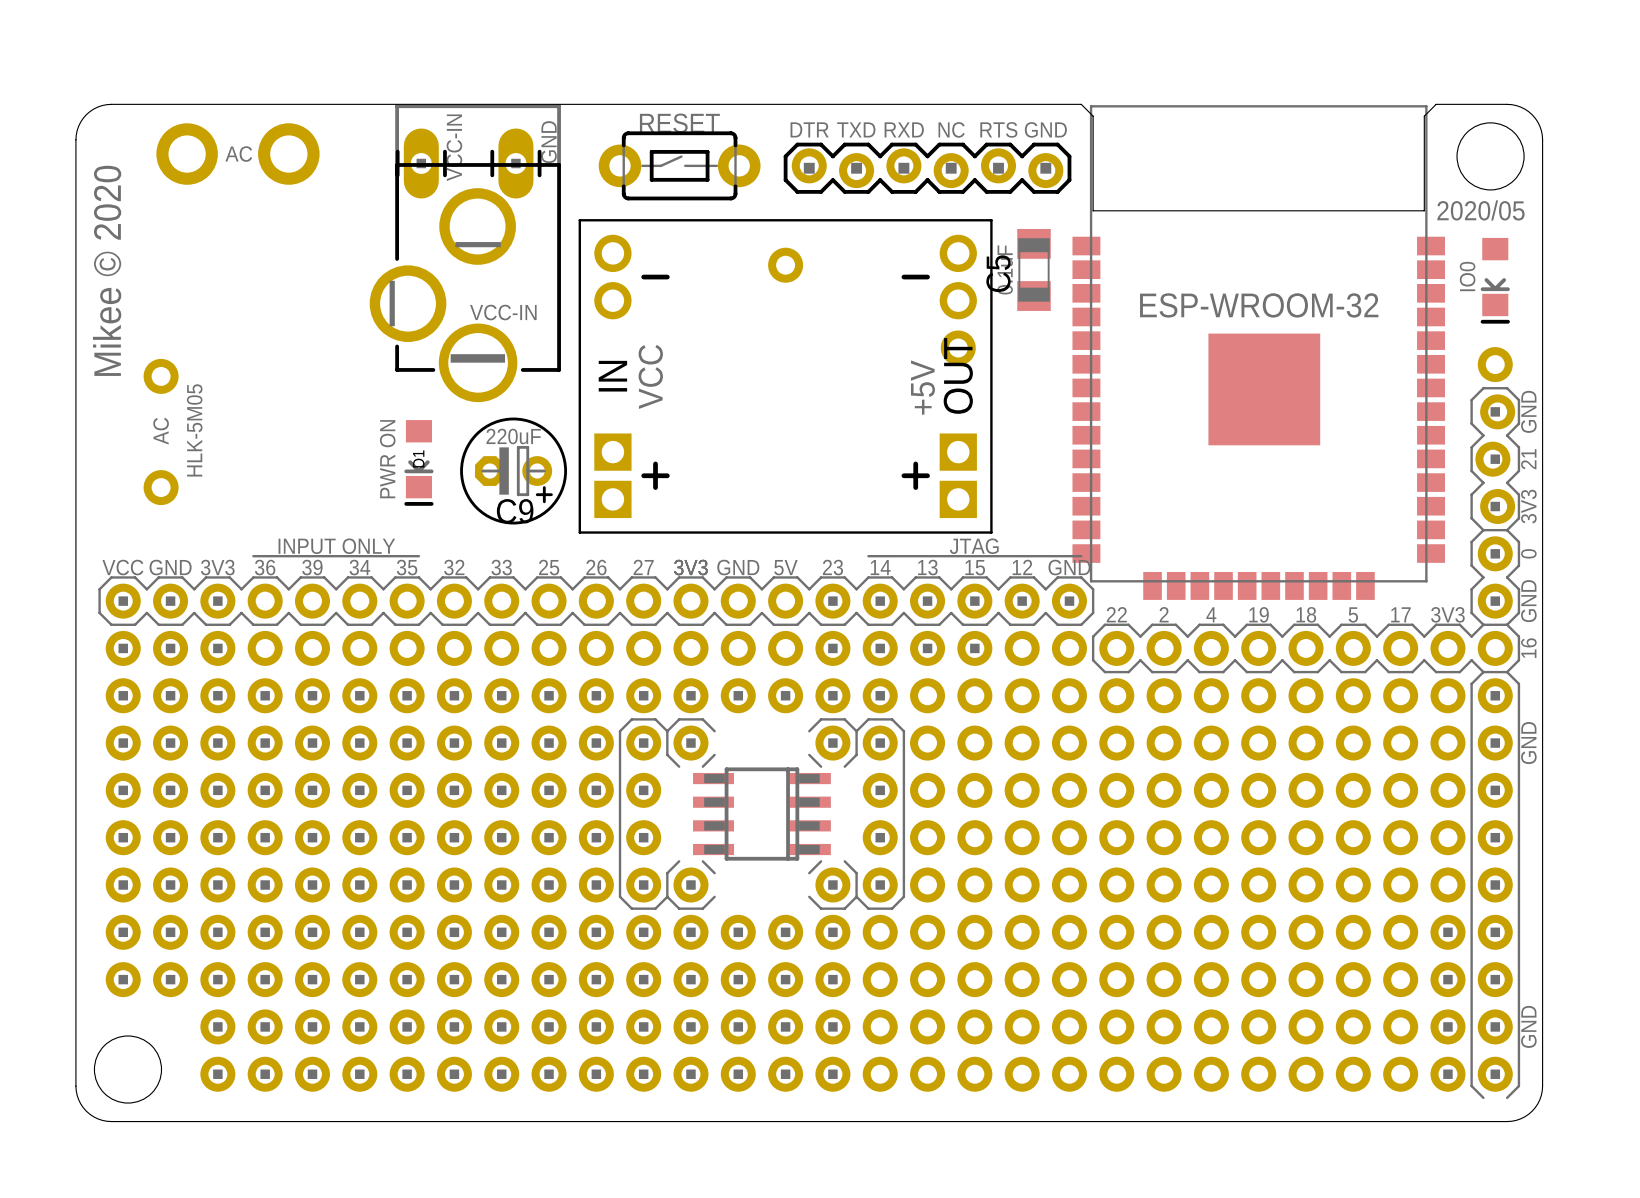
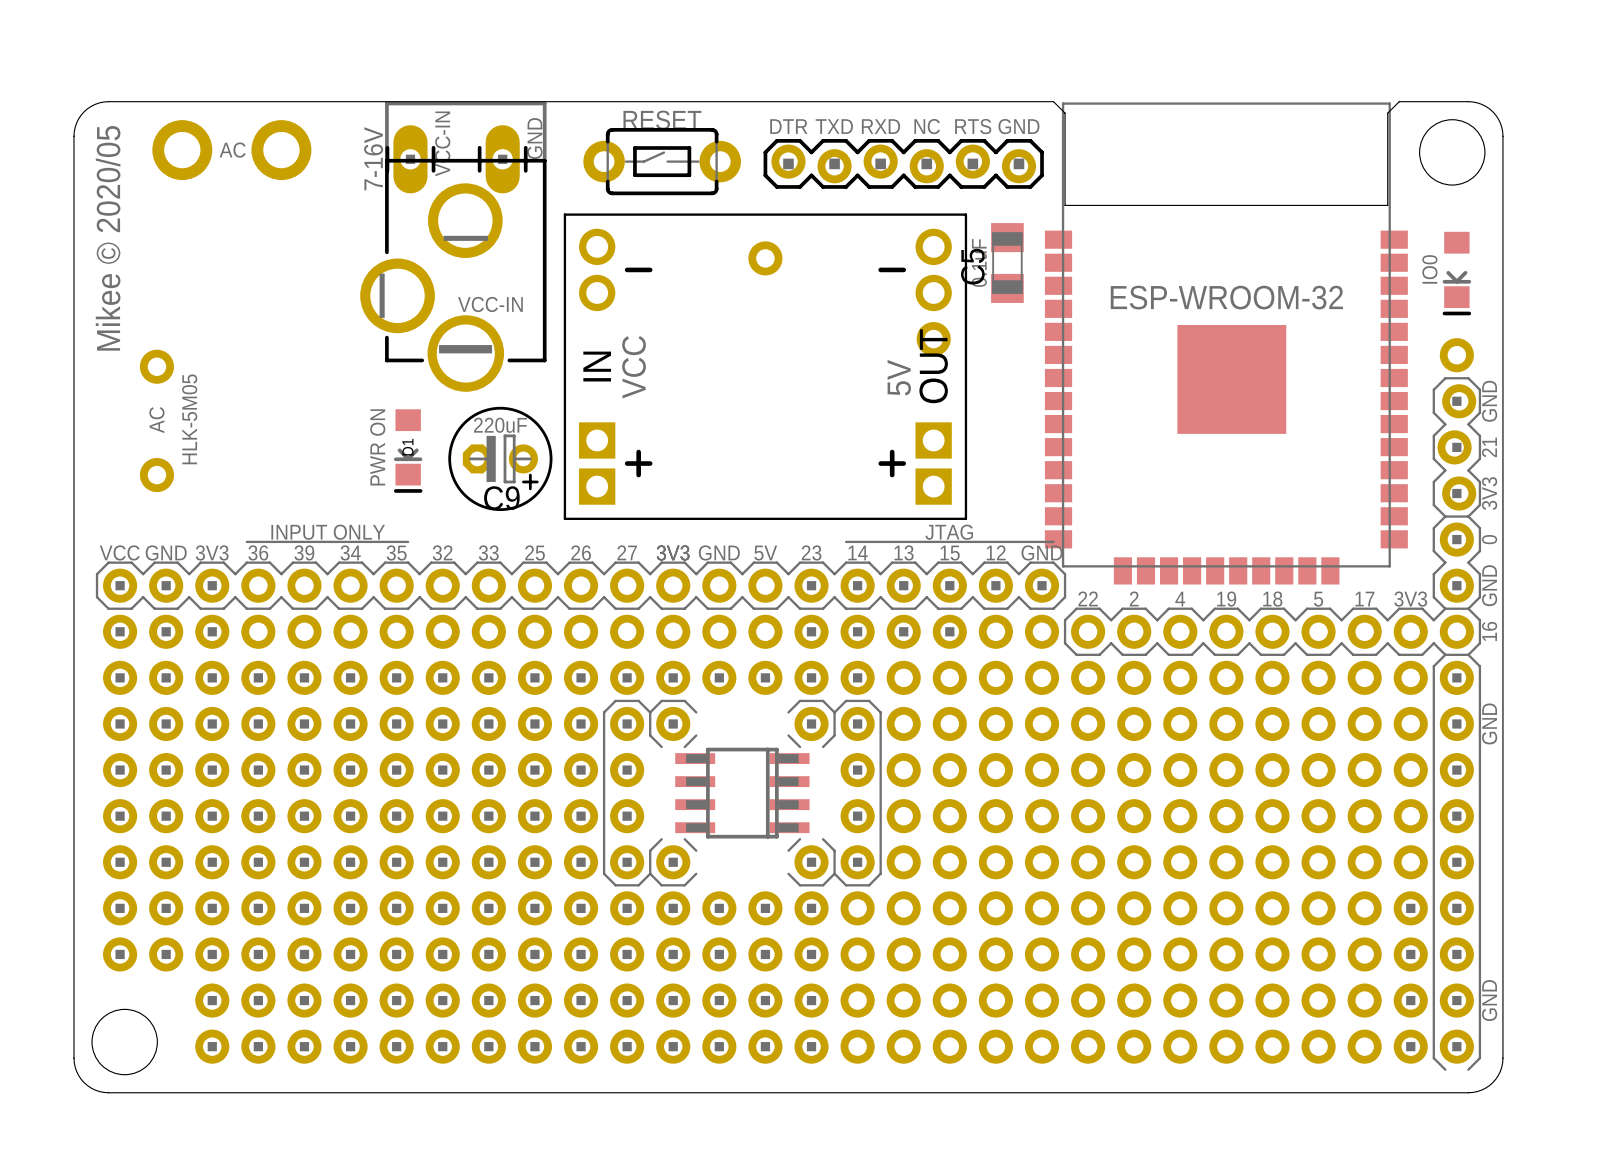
text: none -> 7-16V (373, 158)
text: 2020/05 (1480, 210) -> none
text: Mikee © 2020 (107, 270) -> Mikee © 2020/05 (108, 238)
text: +5V (922, 387) -> 5V (899, 377)

